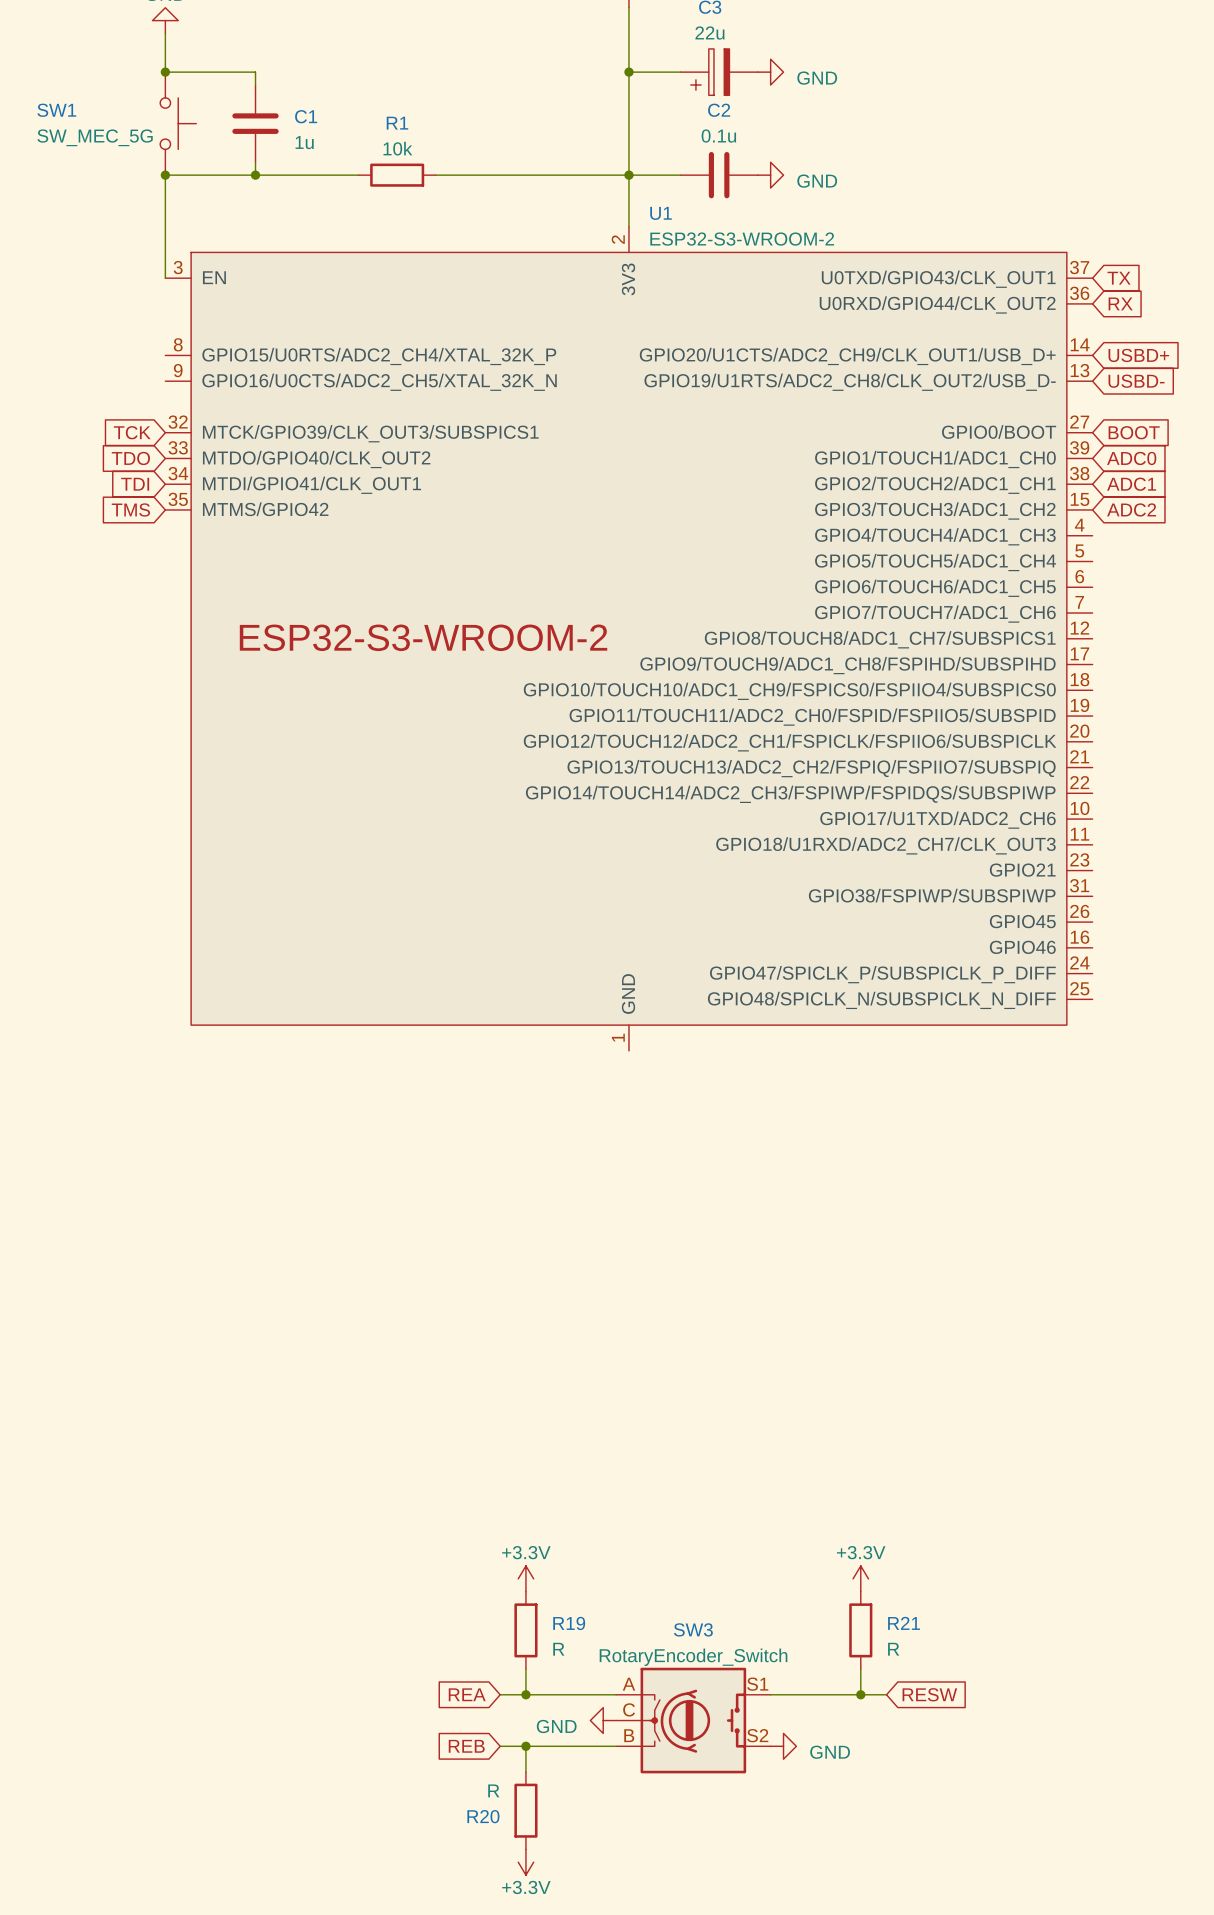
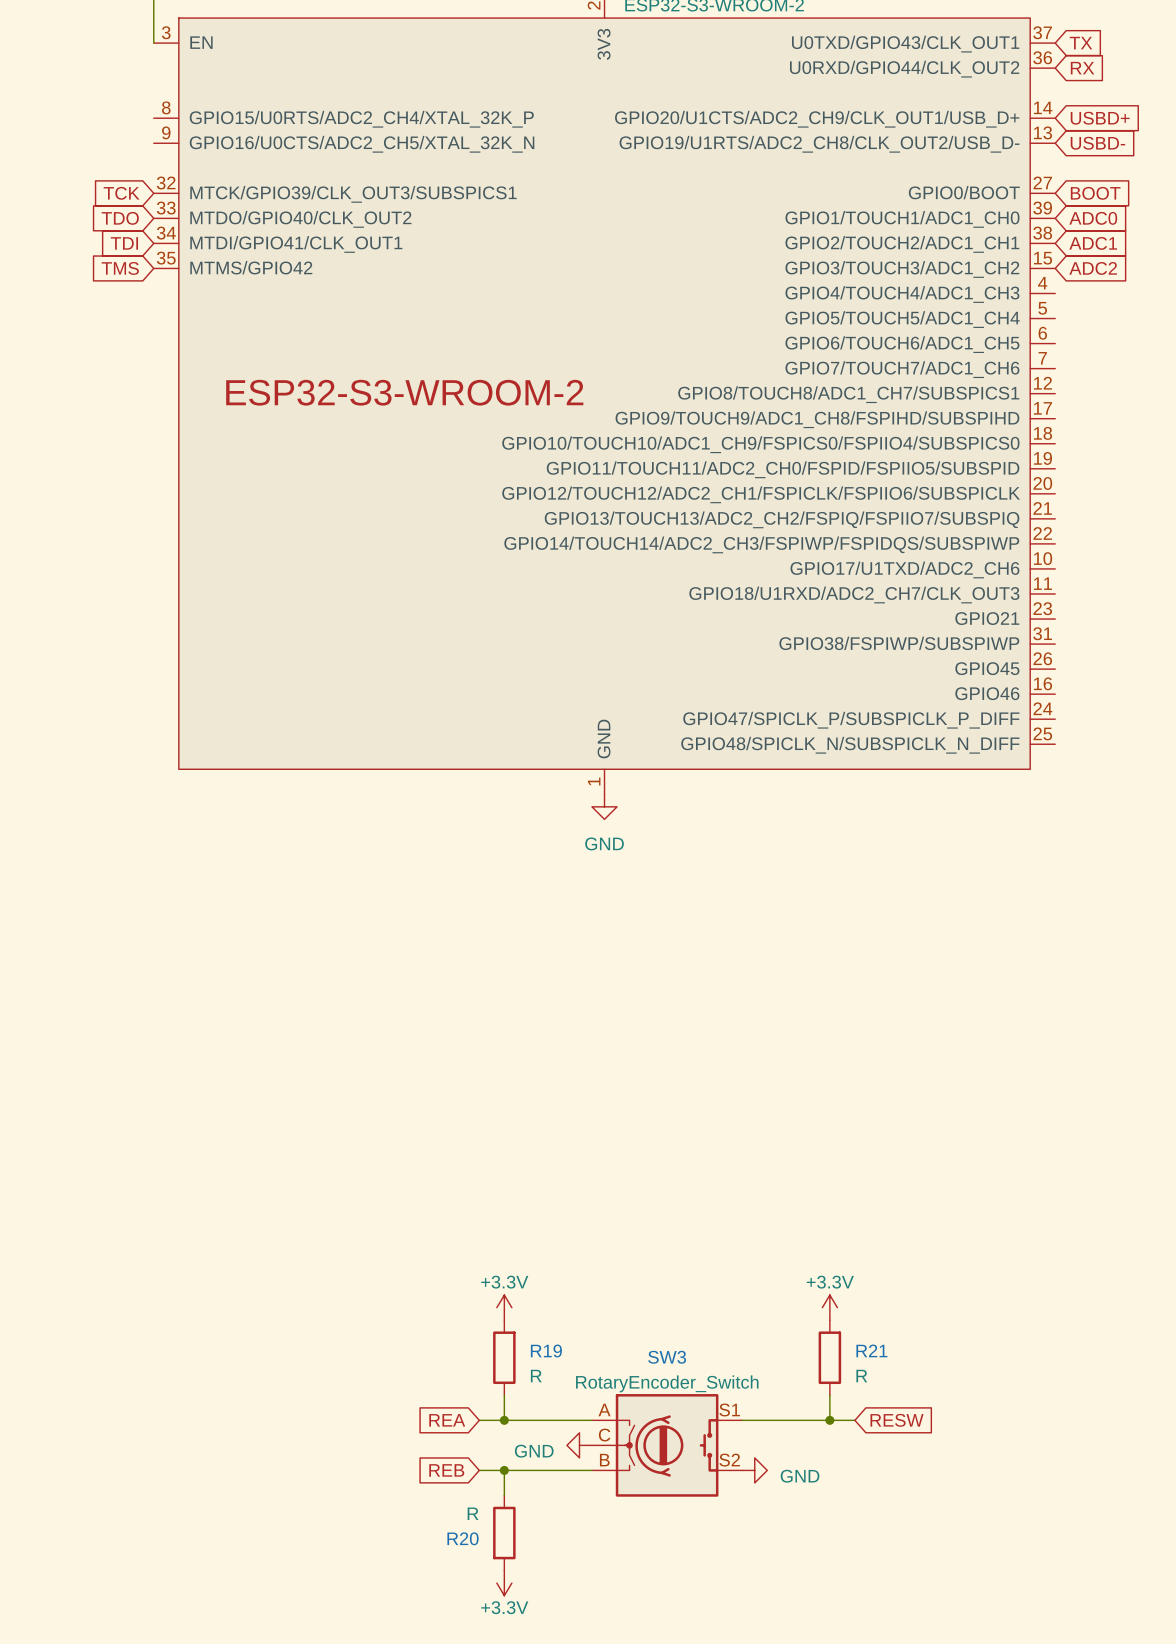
power symbol: none -> GND (604, 806)

